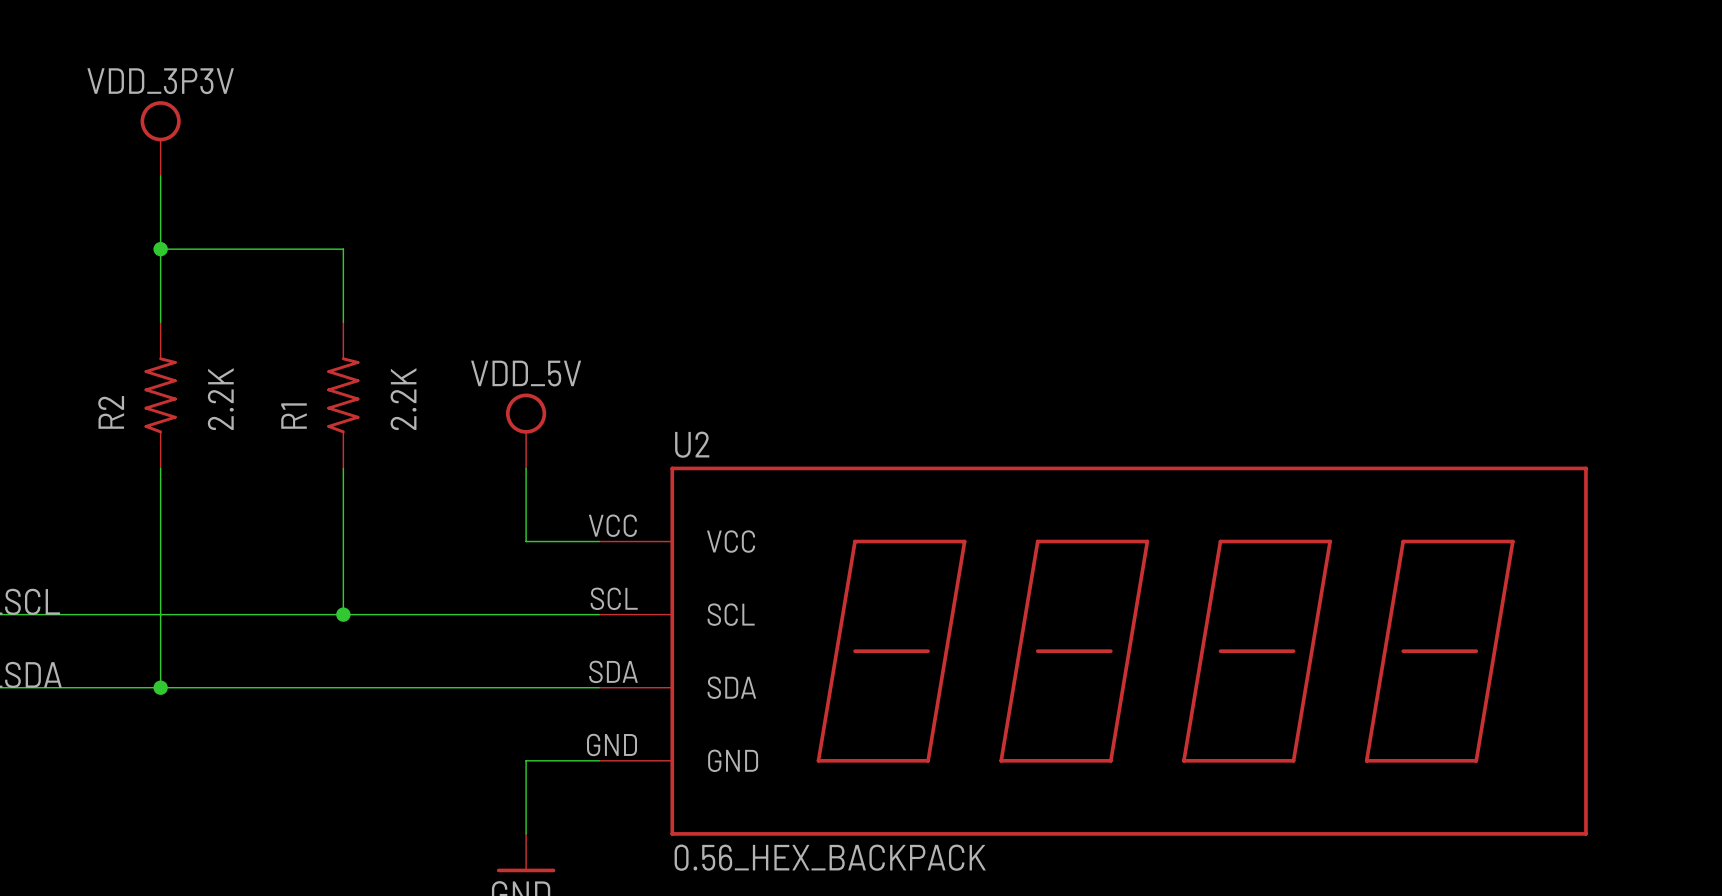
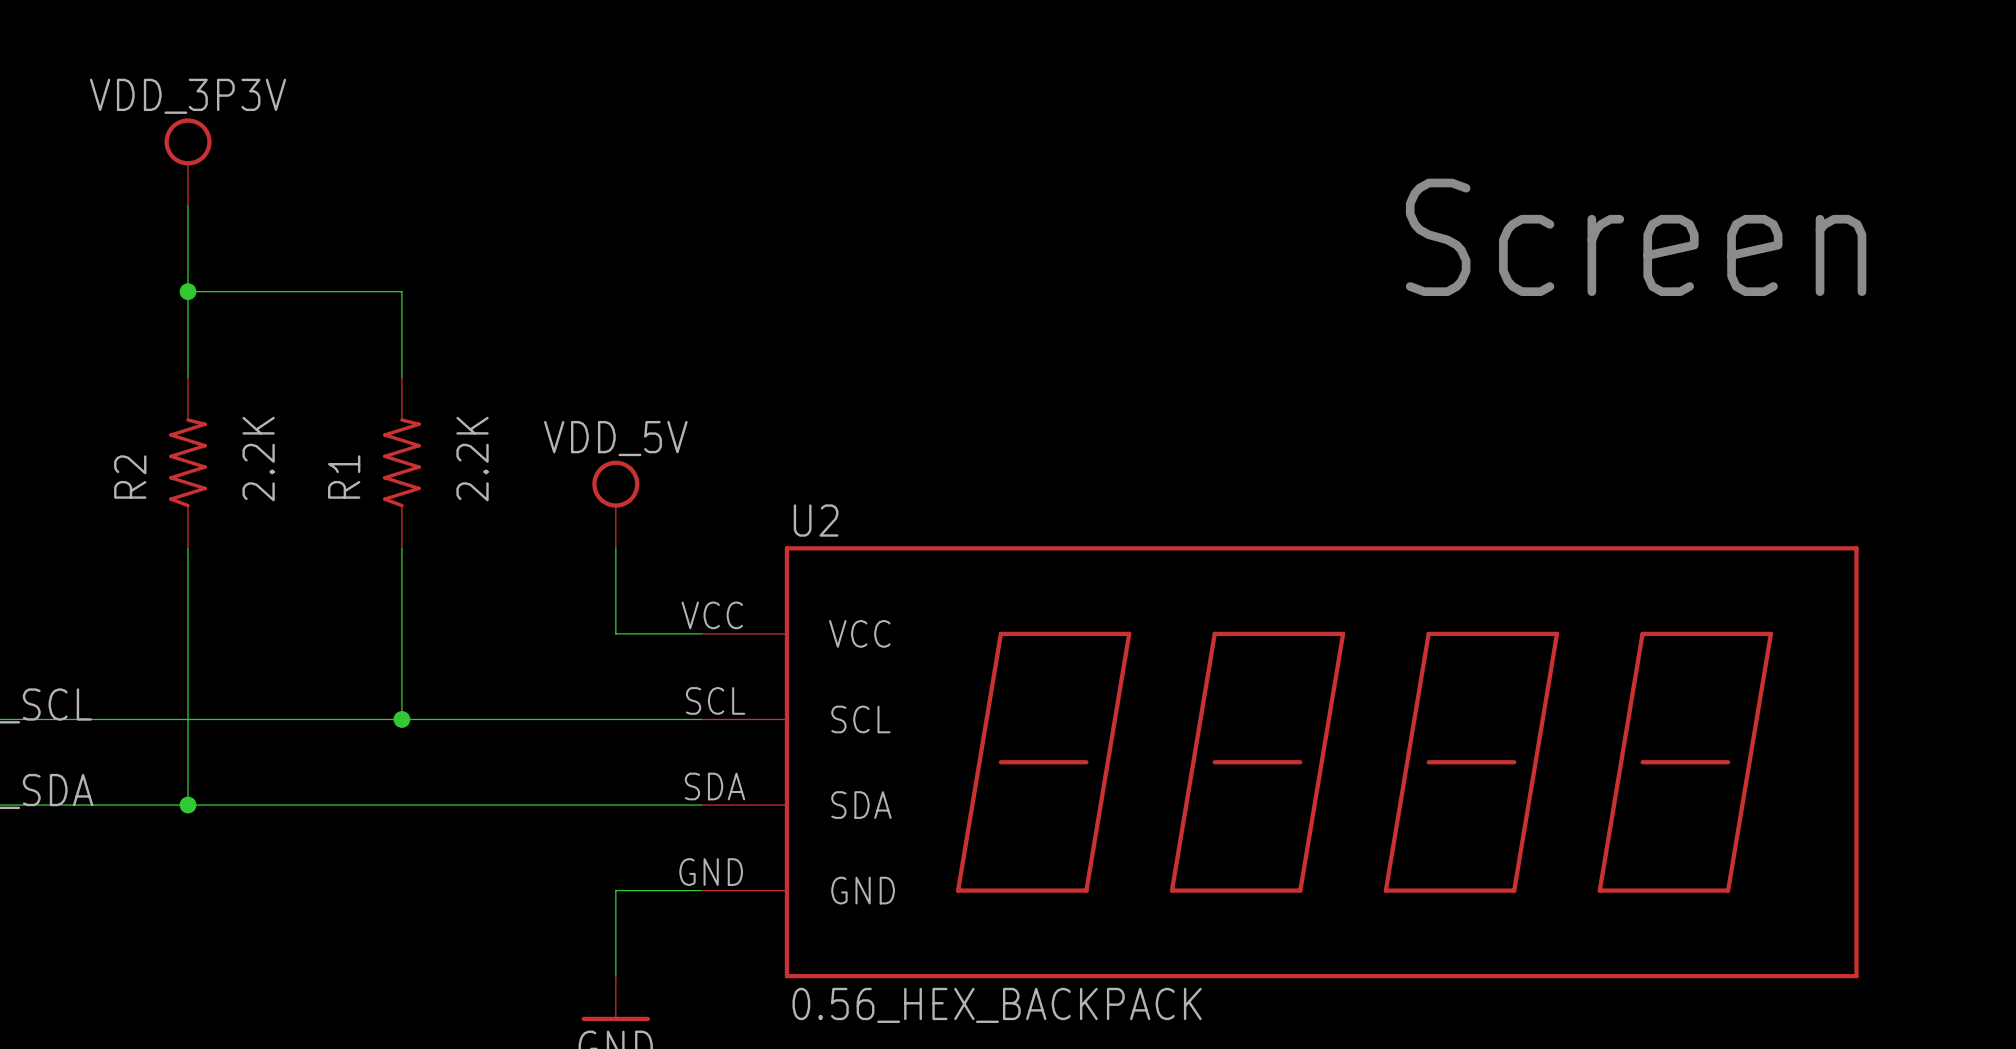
text: none -> Screen (1636, 237)

